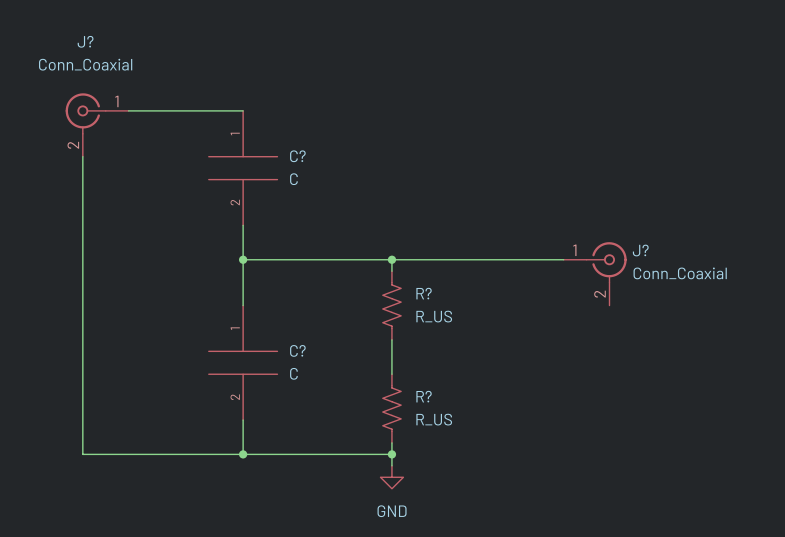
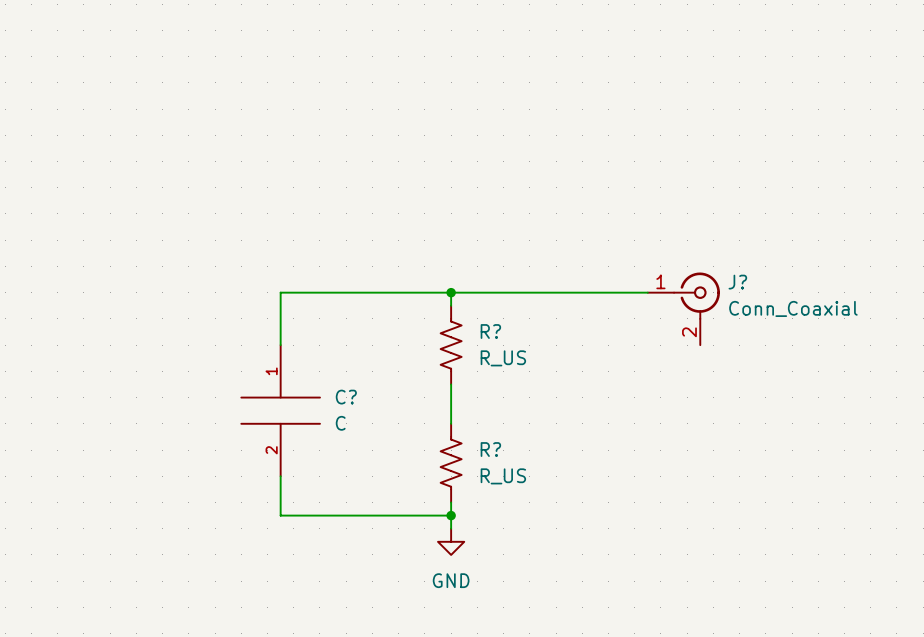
wire: (128, 110) (243, 110) -> none
J?: Conn_Coaxial (97, 125) -> none
wire: (82, 156) (82, 454) (243, 454) -> none
C?: C (243, 168) -> none
wire: (243, 225) (243, 259) -> none
junction: (243, 259) -> none
junction: (243, 454) -> none

